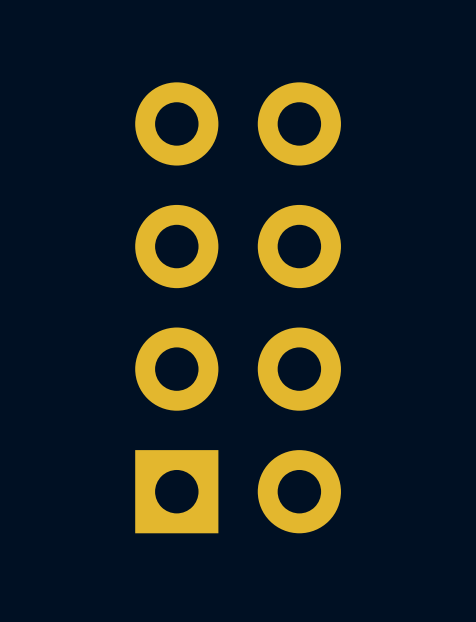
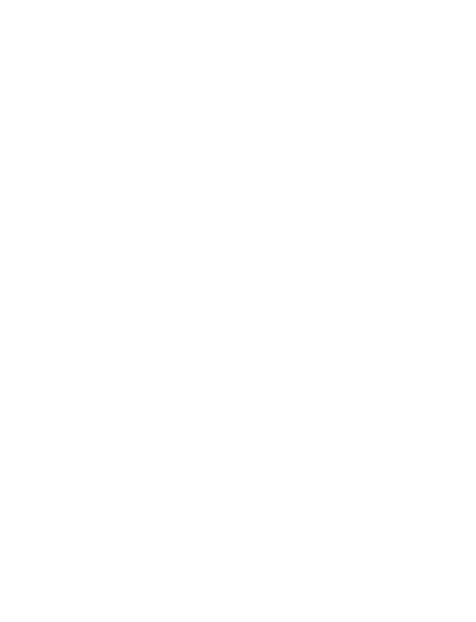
part: (238, 307) -> none

